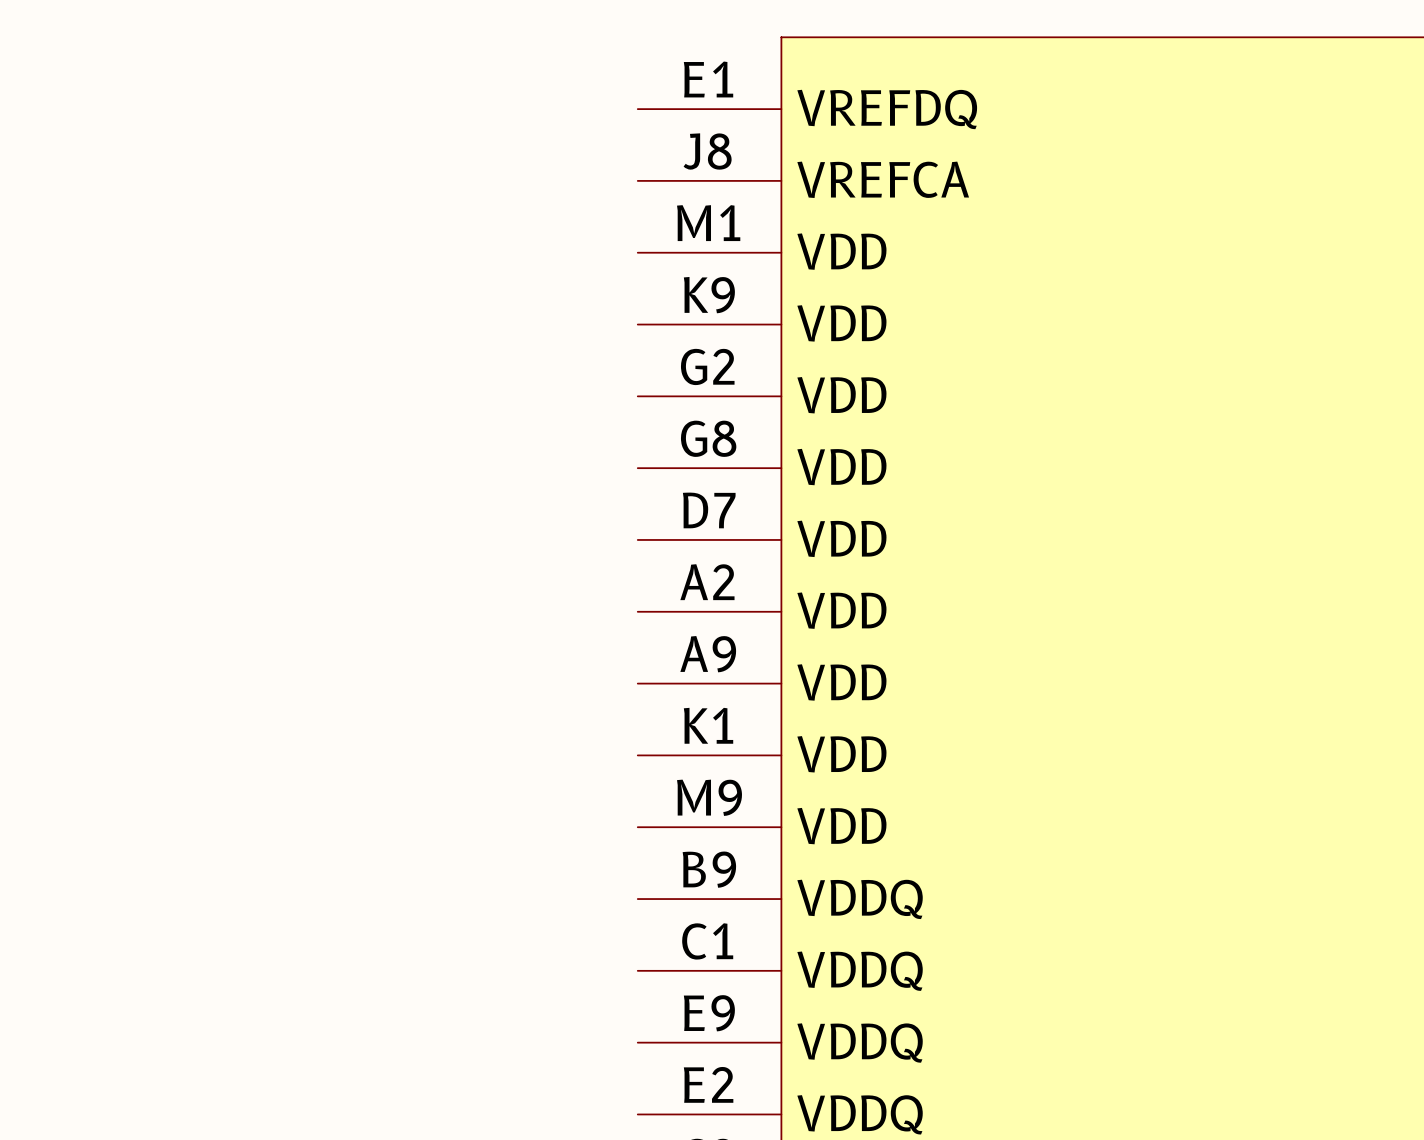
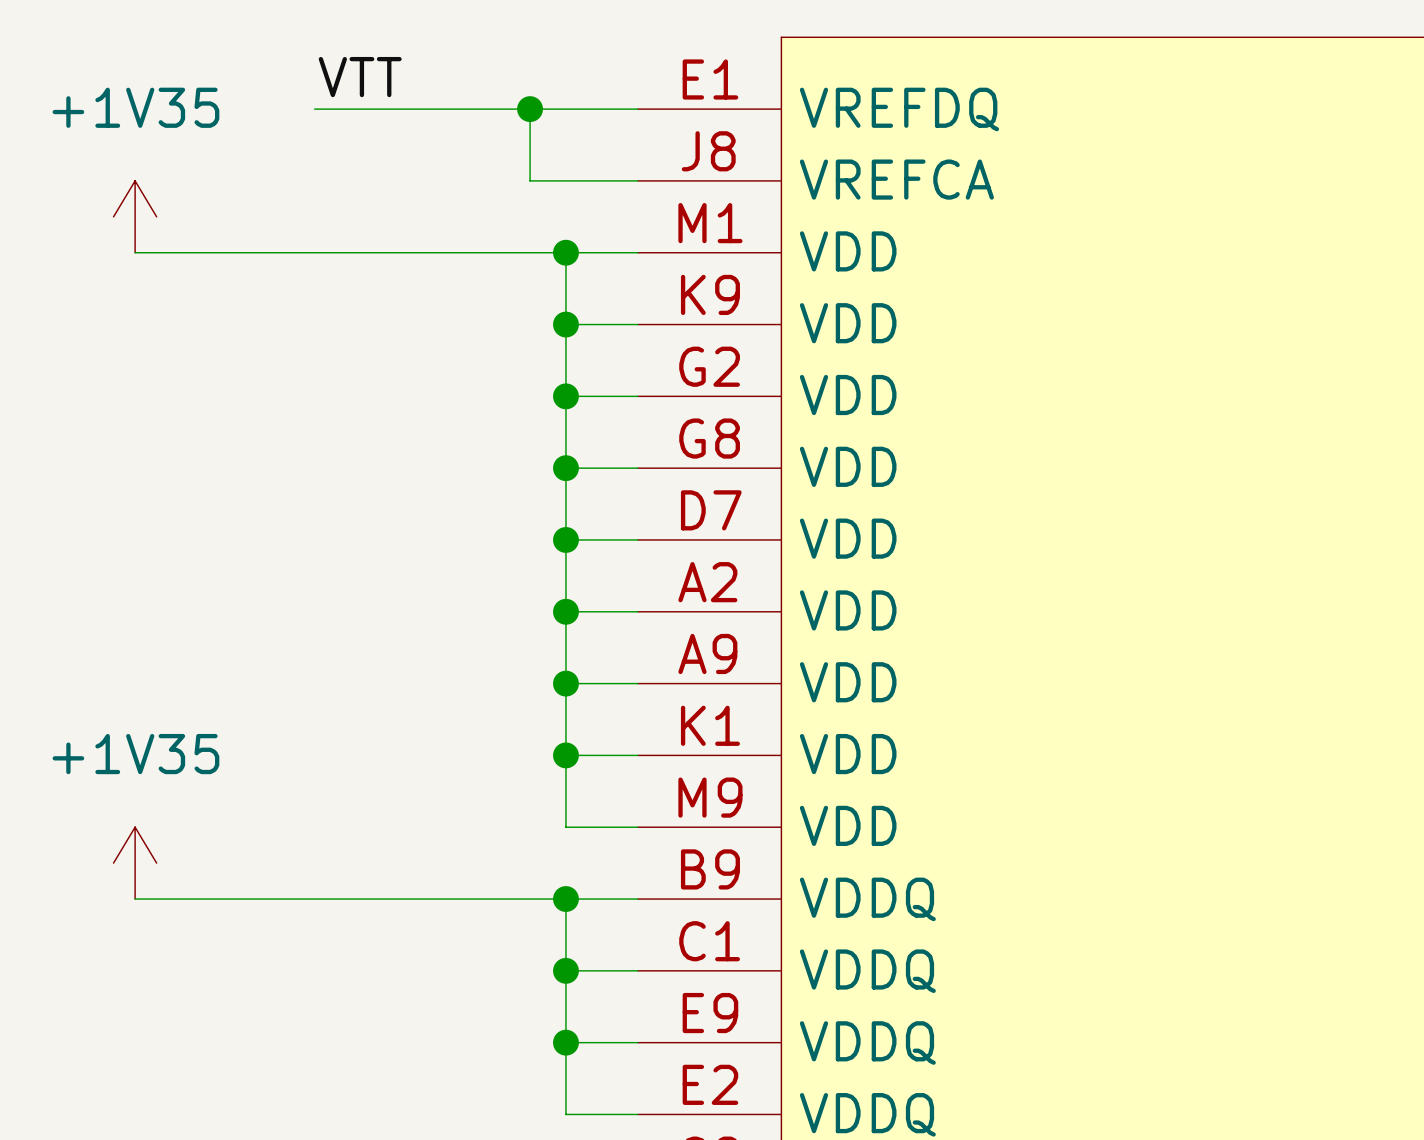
label: none -> VTT (360, 77)
wire: none -> (314, 109) (637, 109)
wire: none -> (530, 109) (530, 180) (637, 180)
junction: none -> (530, 109)
power symbol: none -> +1V35 (135, 216)
wire: none -> (135, 252) (637, 252)
wire: none -> (565, 252) (565, 827) (637, 827)
junction: none -> (565, 252)
wire: none -> (565, 324) (637, 324)
junction: none -> (565, 324)
wire: none -> (565, 396) (637, 396)
junction: none -> (565, 396)
wire: none -> (565, 468) (637, 468)
junction: none -> (565, 468)
wire: none -> (565, 539) (637, 539)
junction: none -> (565, 539)
wire: none -> (565, 611) (637, 611)
junction: none -> (565, 611)
wire: none -> (565, 683) (637, 683)
junction: none -> (565, 683)
wire: none -> (565, 755) (637, 755)
junction: none -> (565, 755)
power symbol: none -> +1V35 (135, 863)
wire: none -> (135, 899) (637, 899)
wire: none -> (565, 899) (565, 1114) (637, 1114)
junction: none -> (565, 899)
wire: none -> (565, 970) (637, 970)
junction: none -> (565, 970)
wire: none -> (565, 1042) (637, 1042)
junction: none -> (565, 1042)

